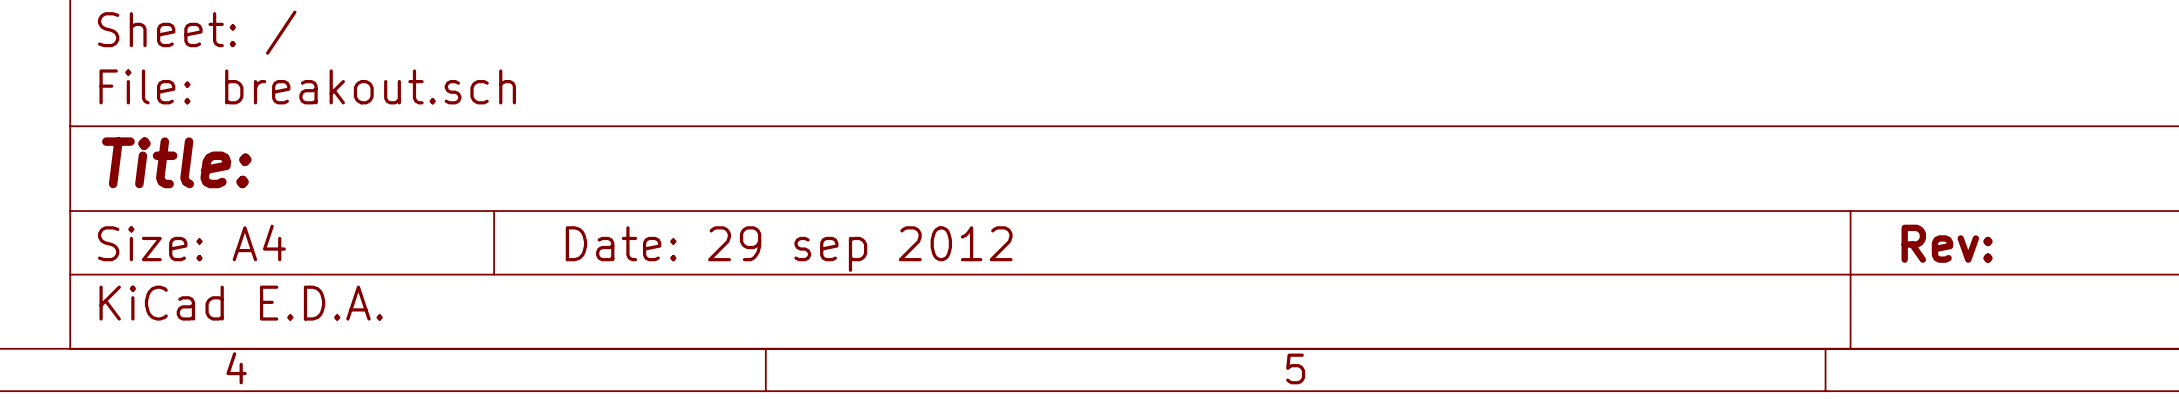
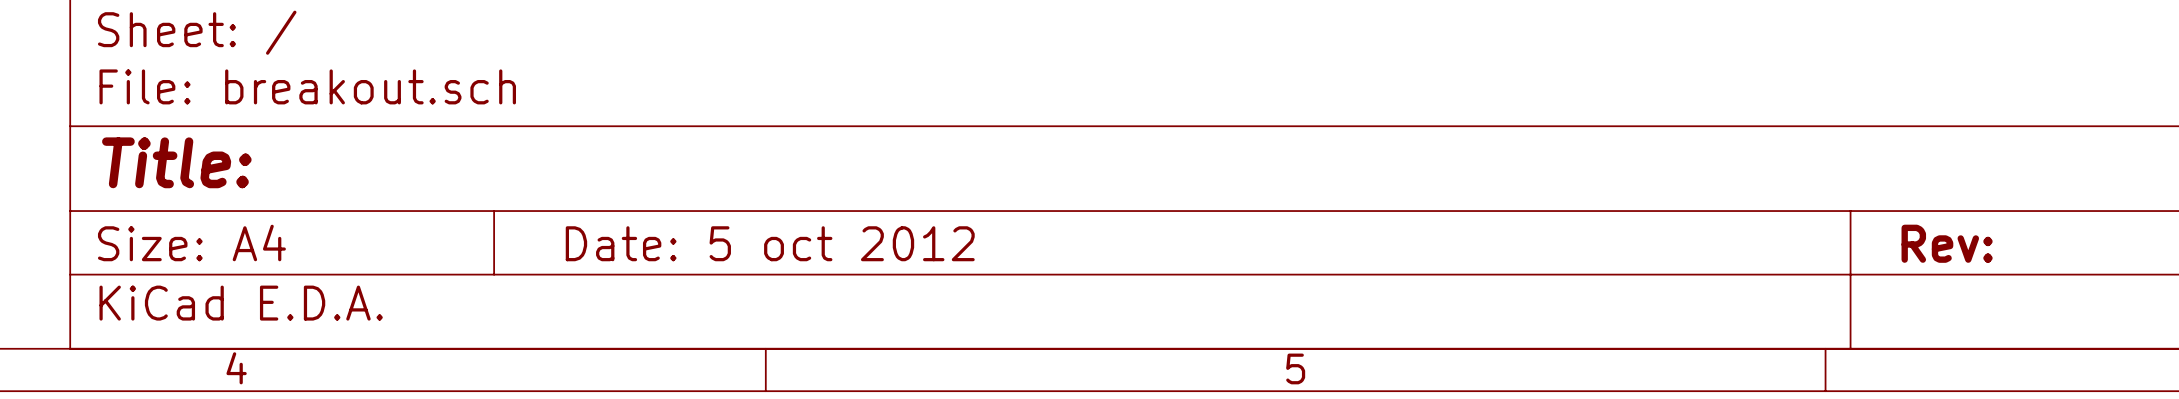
title block: Date: 29 sep 2012 (789, 249) -> Date: 5 oct 2012 (770, 243)

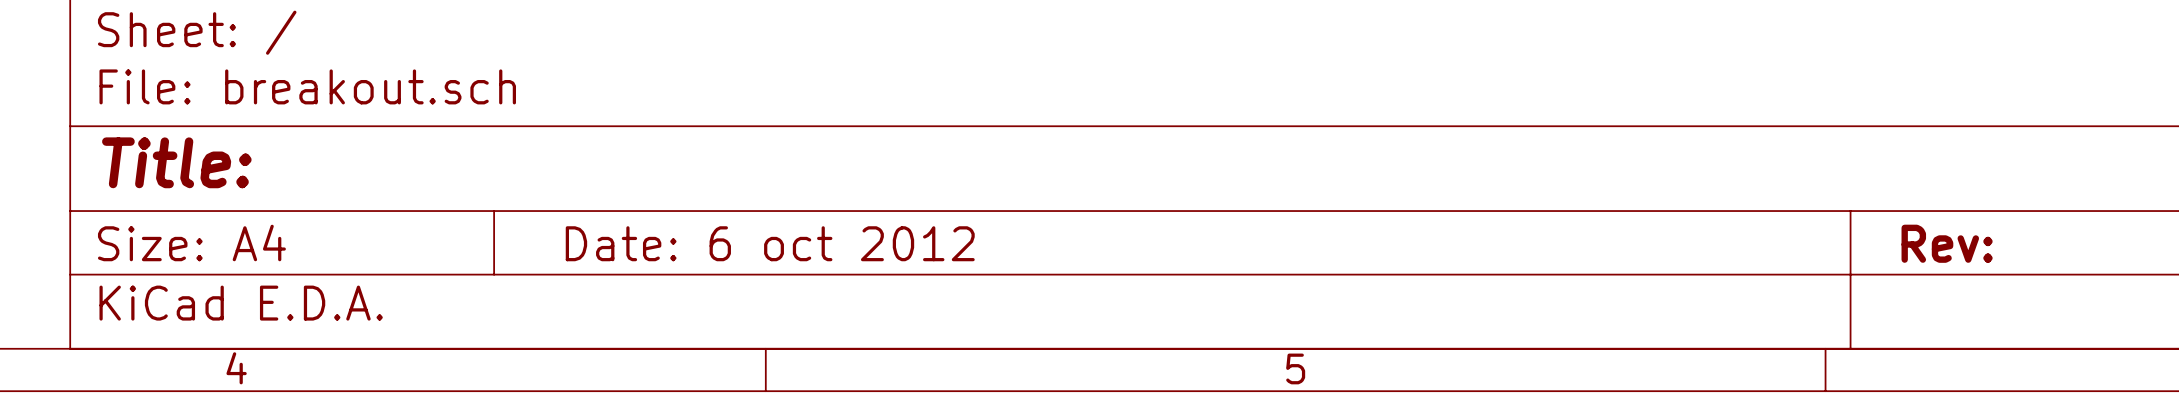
title block: Date: 5 oct 2012 (770, 243) -> Date: 6 oct 2012 (770, 243)

